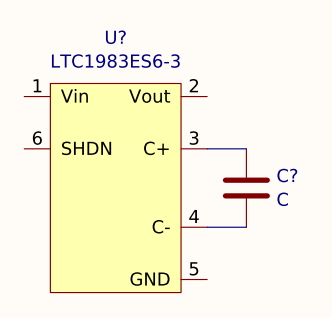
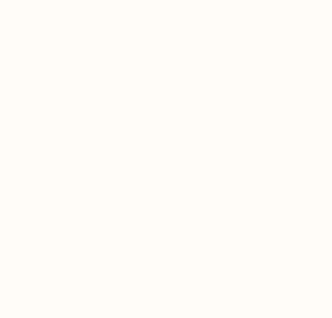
wire: (207, 148) (246, 148) -> none
U?: LTC1983ES6-3 (115, 188) -> none
C?: C (246, 188) -> none
wire: (207, 227) (246, 227) -> none

